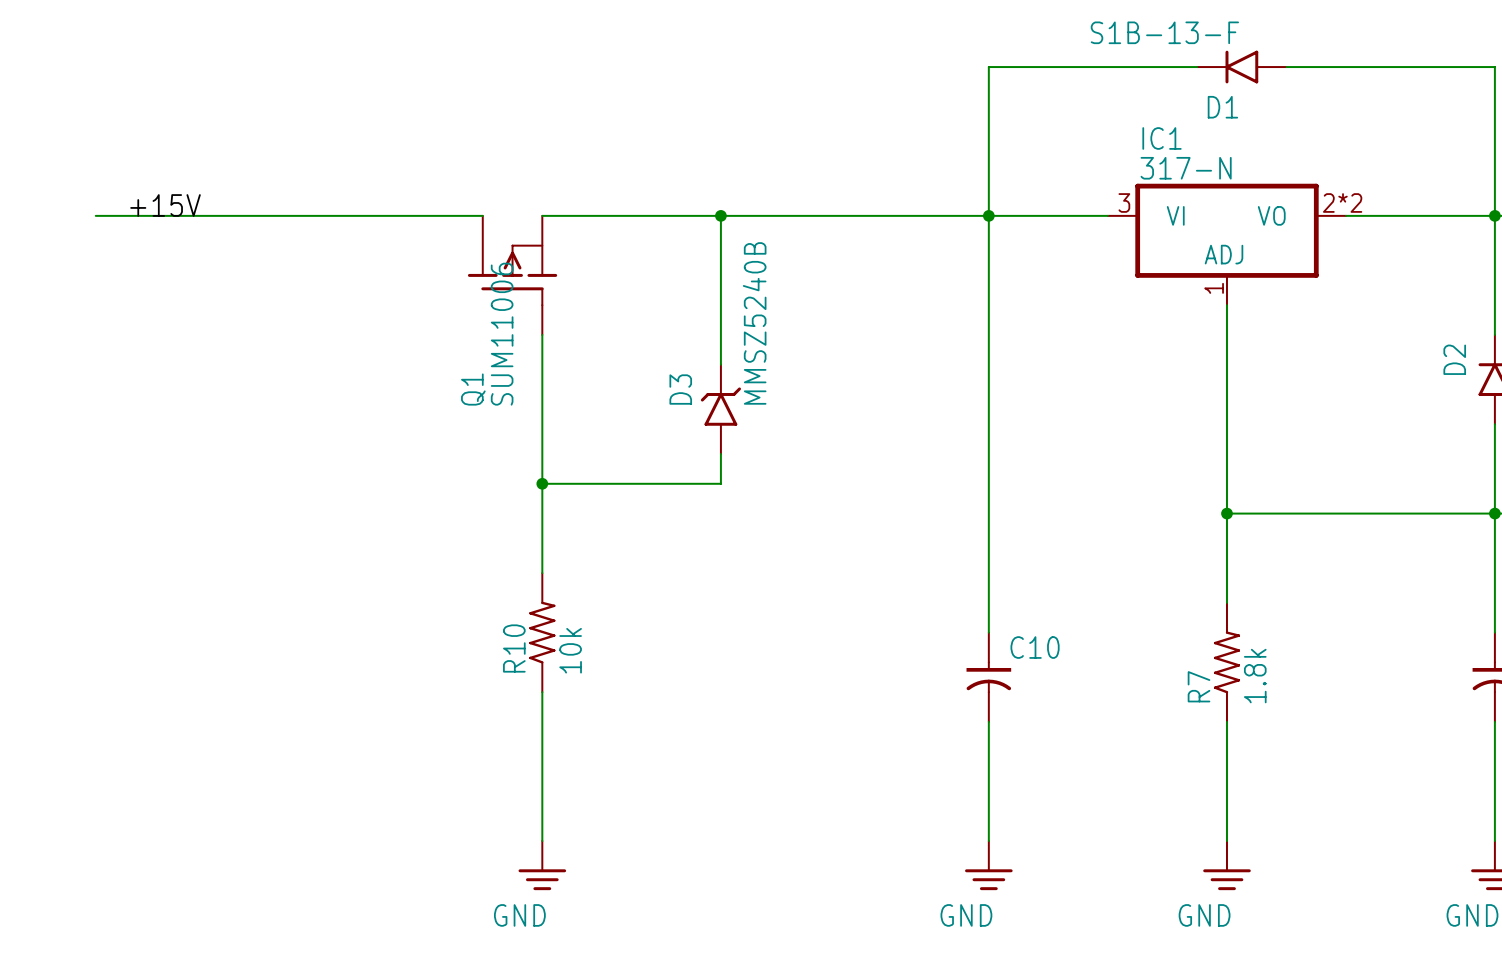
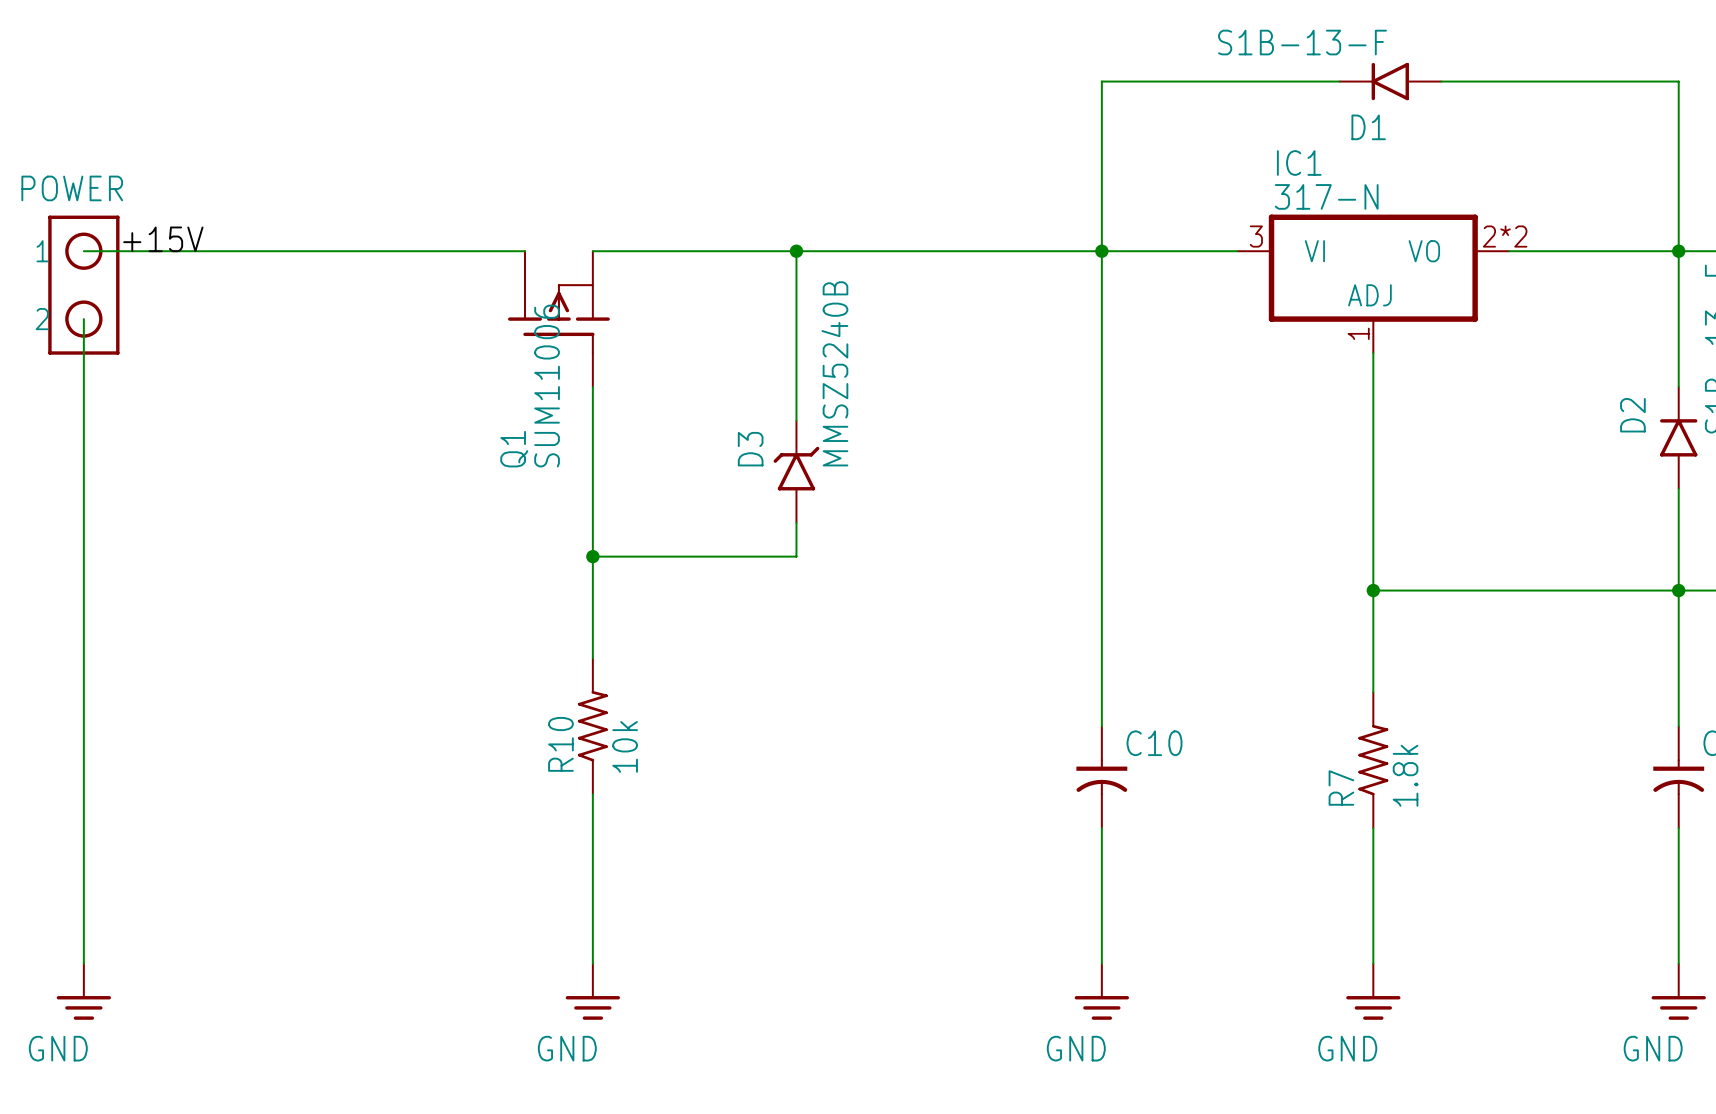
POWER: none -> (83, 285)
wire: none -> (83, 319) (83, 963)
power symbol: none -> GND (83, 991)

